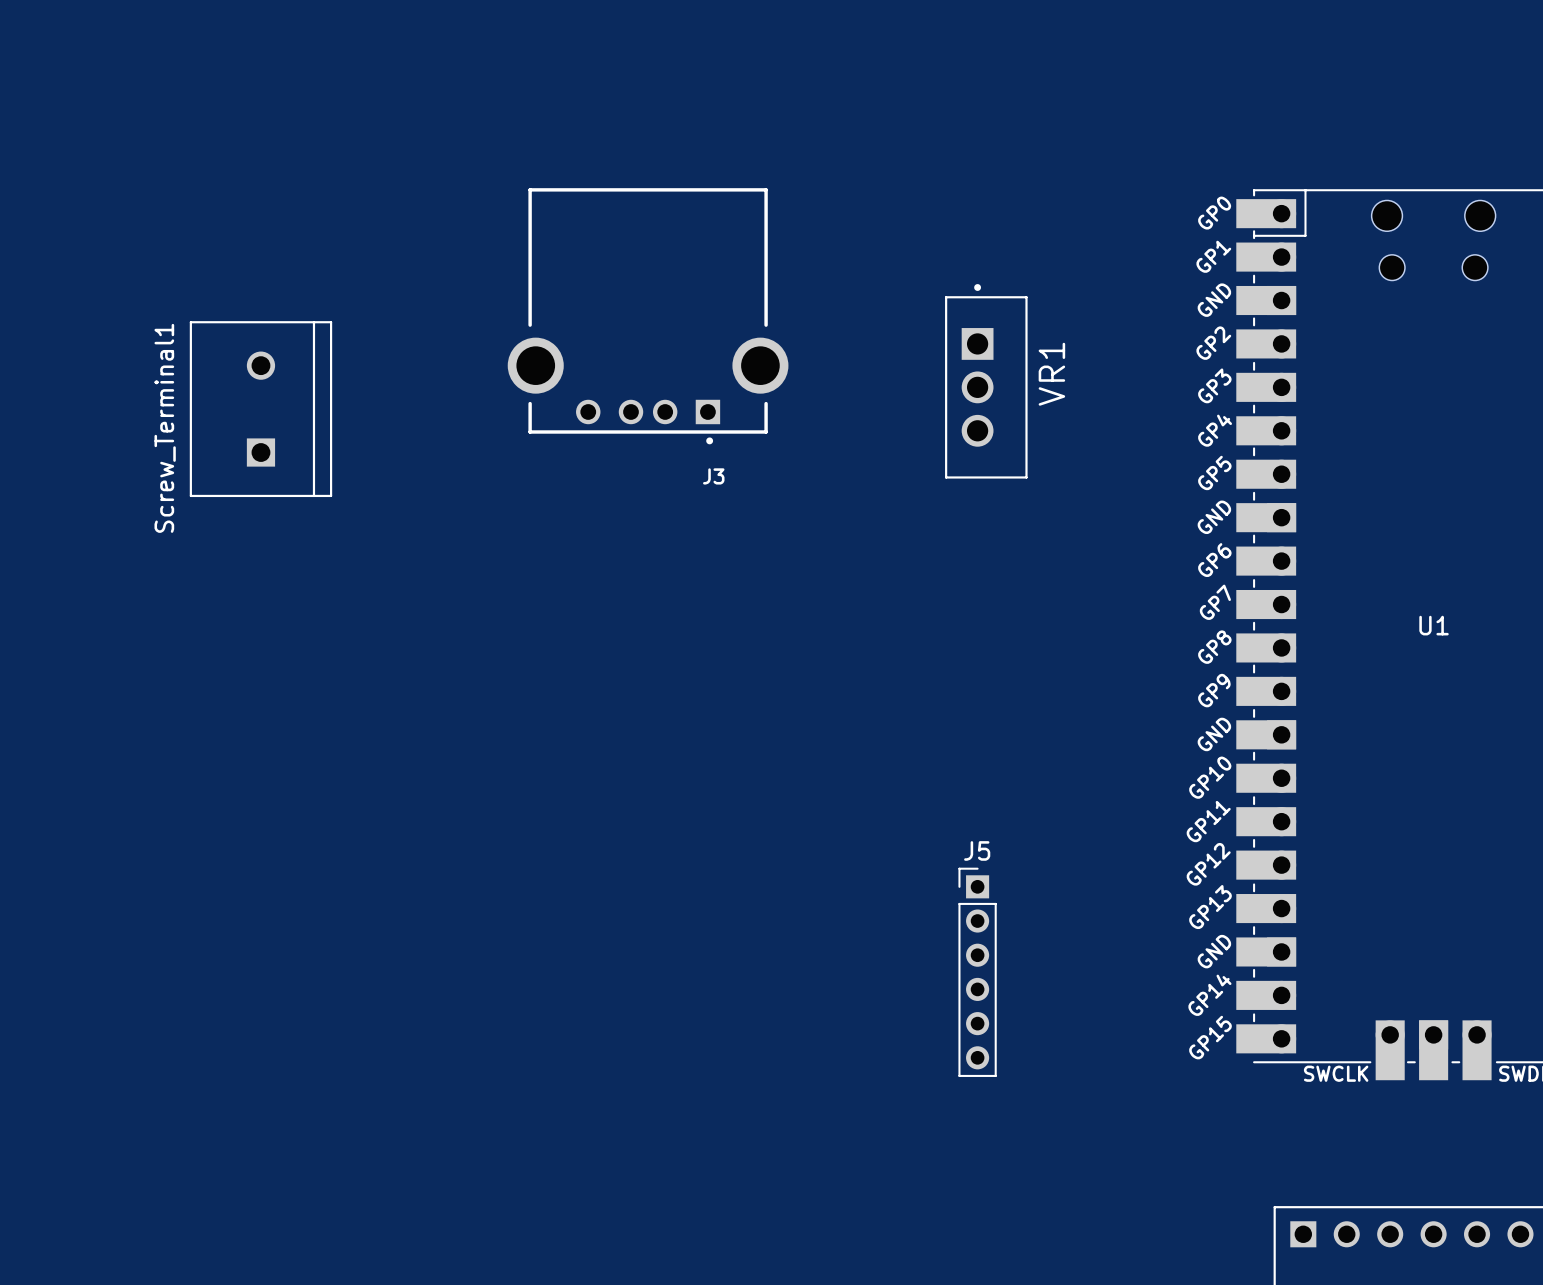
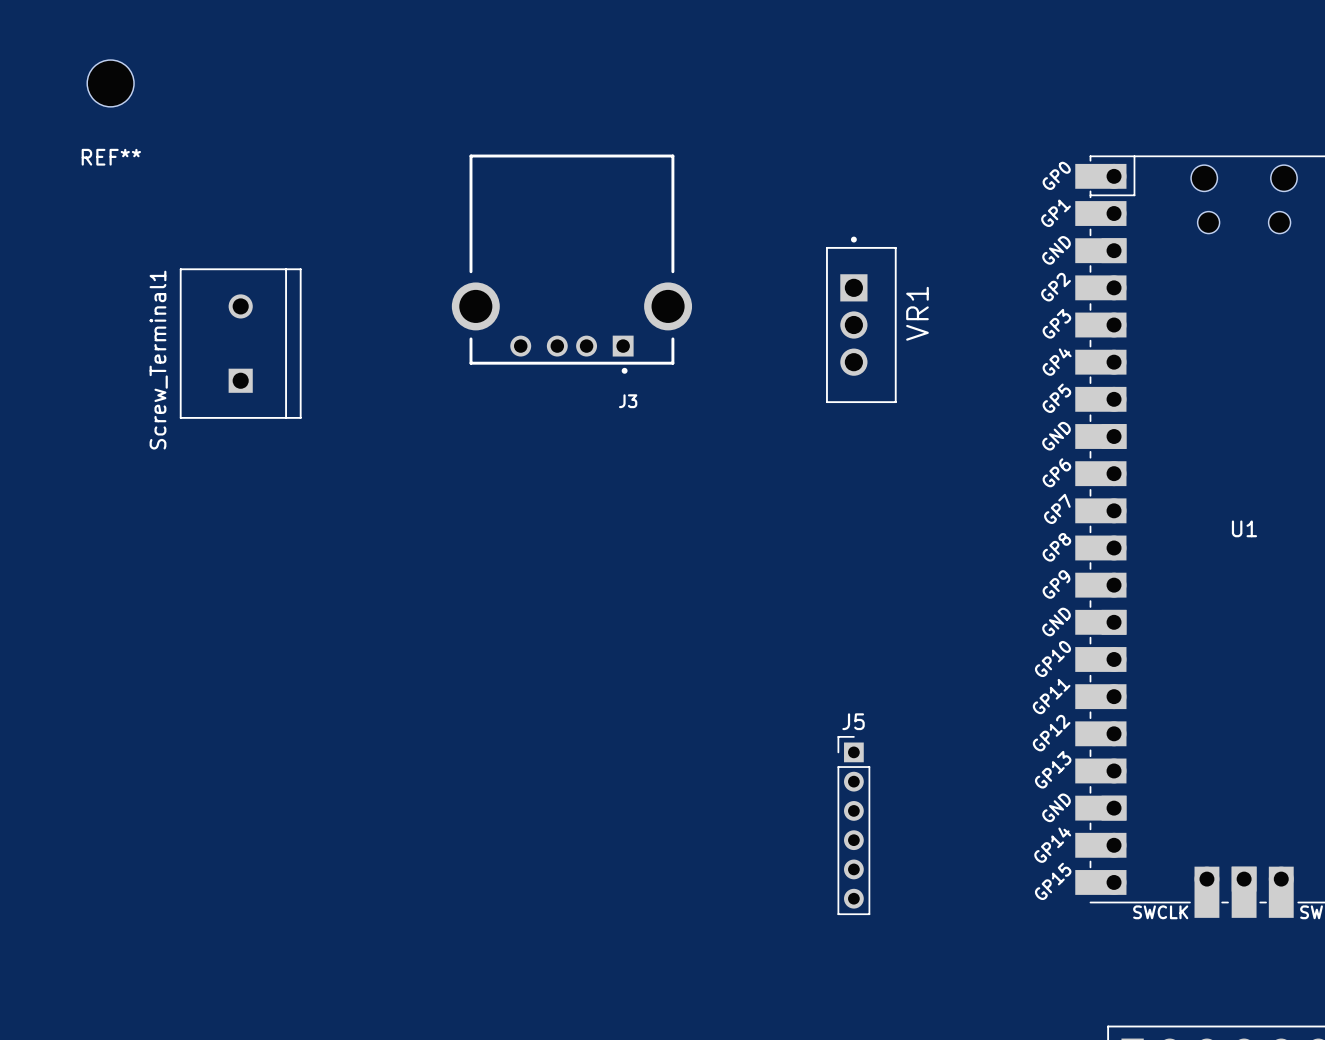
REF**: none -> (110, 83)

